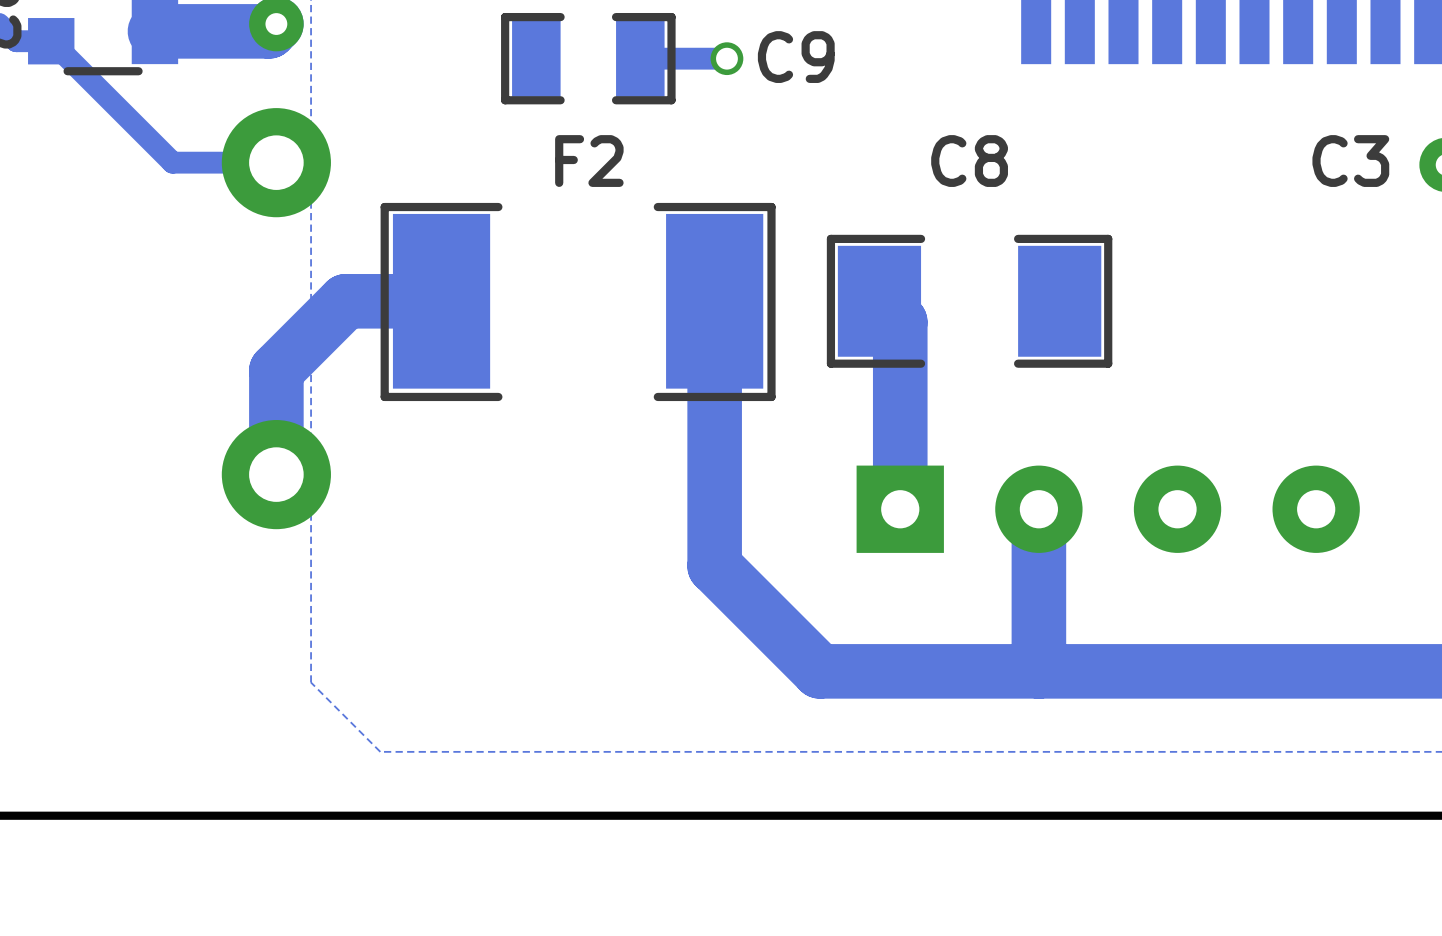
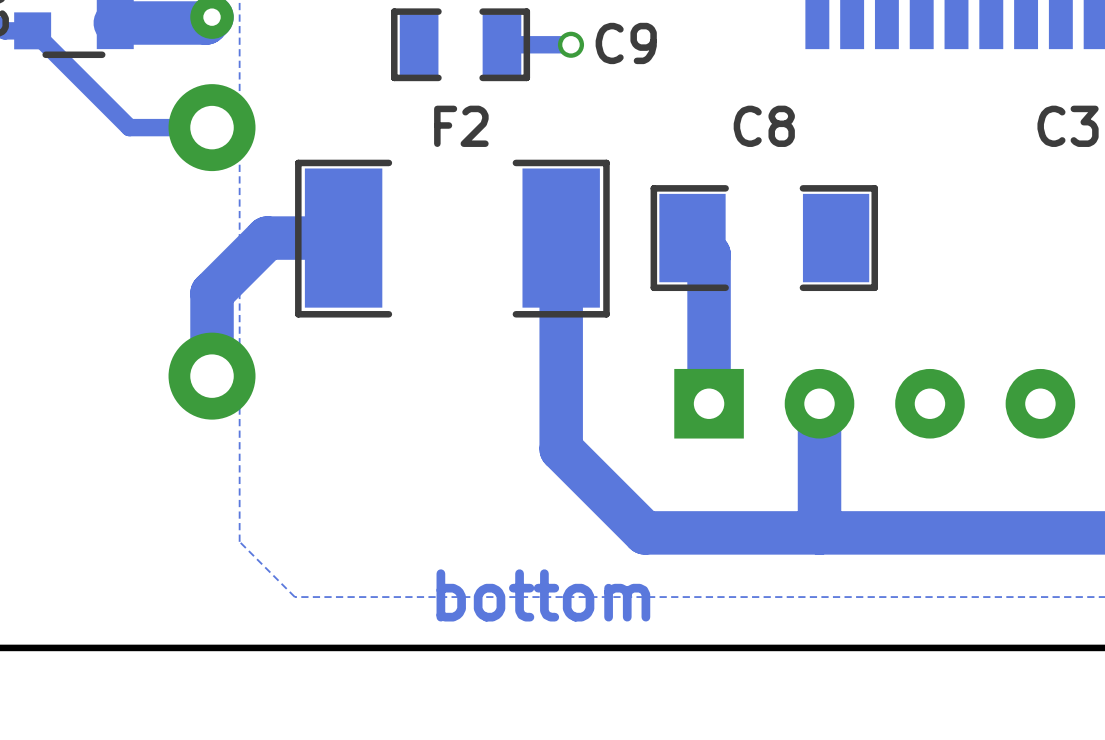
text: none -> bottom (543, 595)

